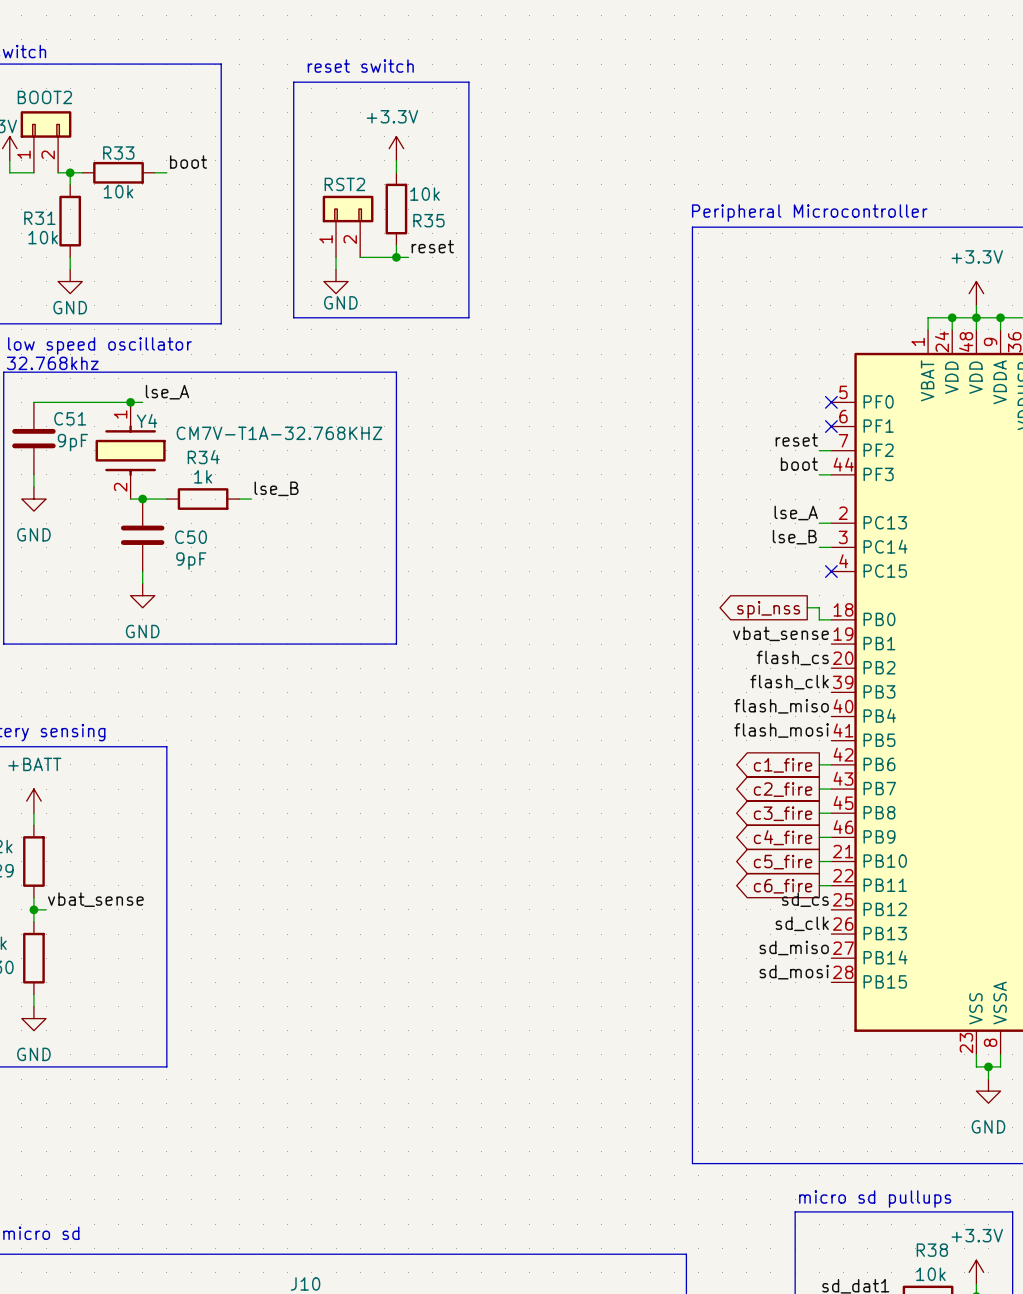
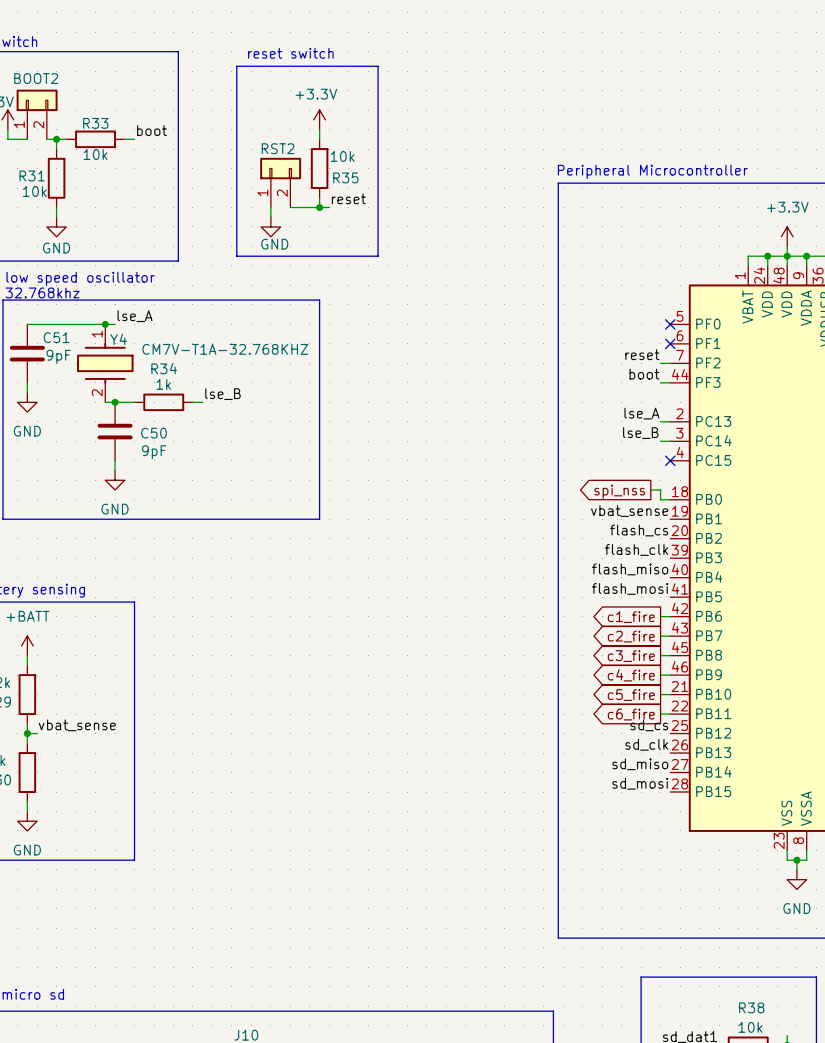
text: micro sd pullups (875, 1199) -> none
power symbol: +3.3V (976, 1272) -> none

